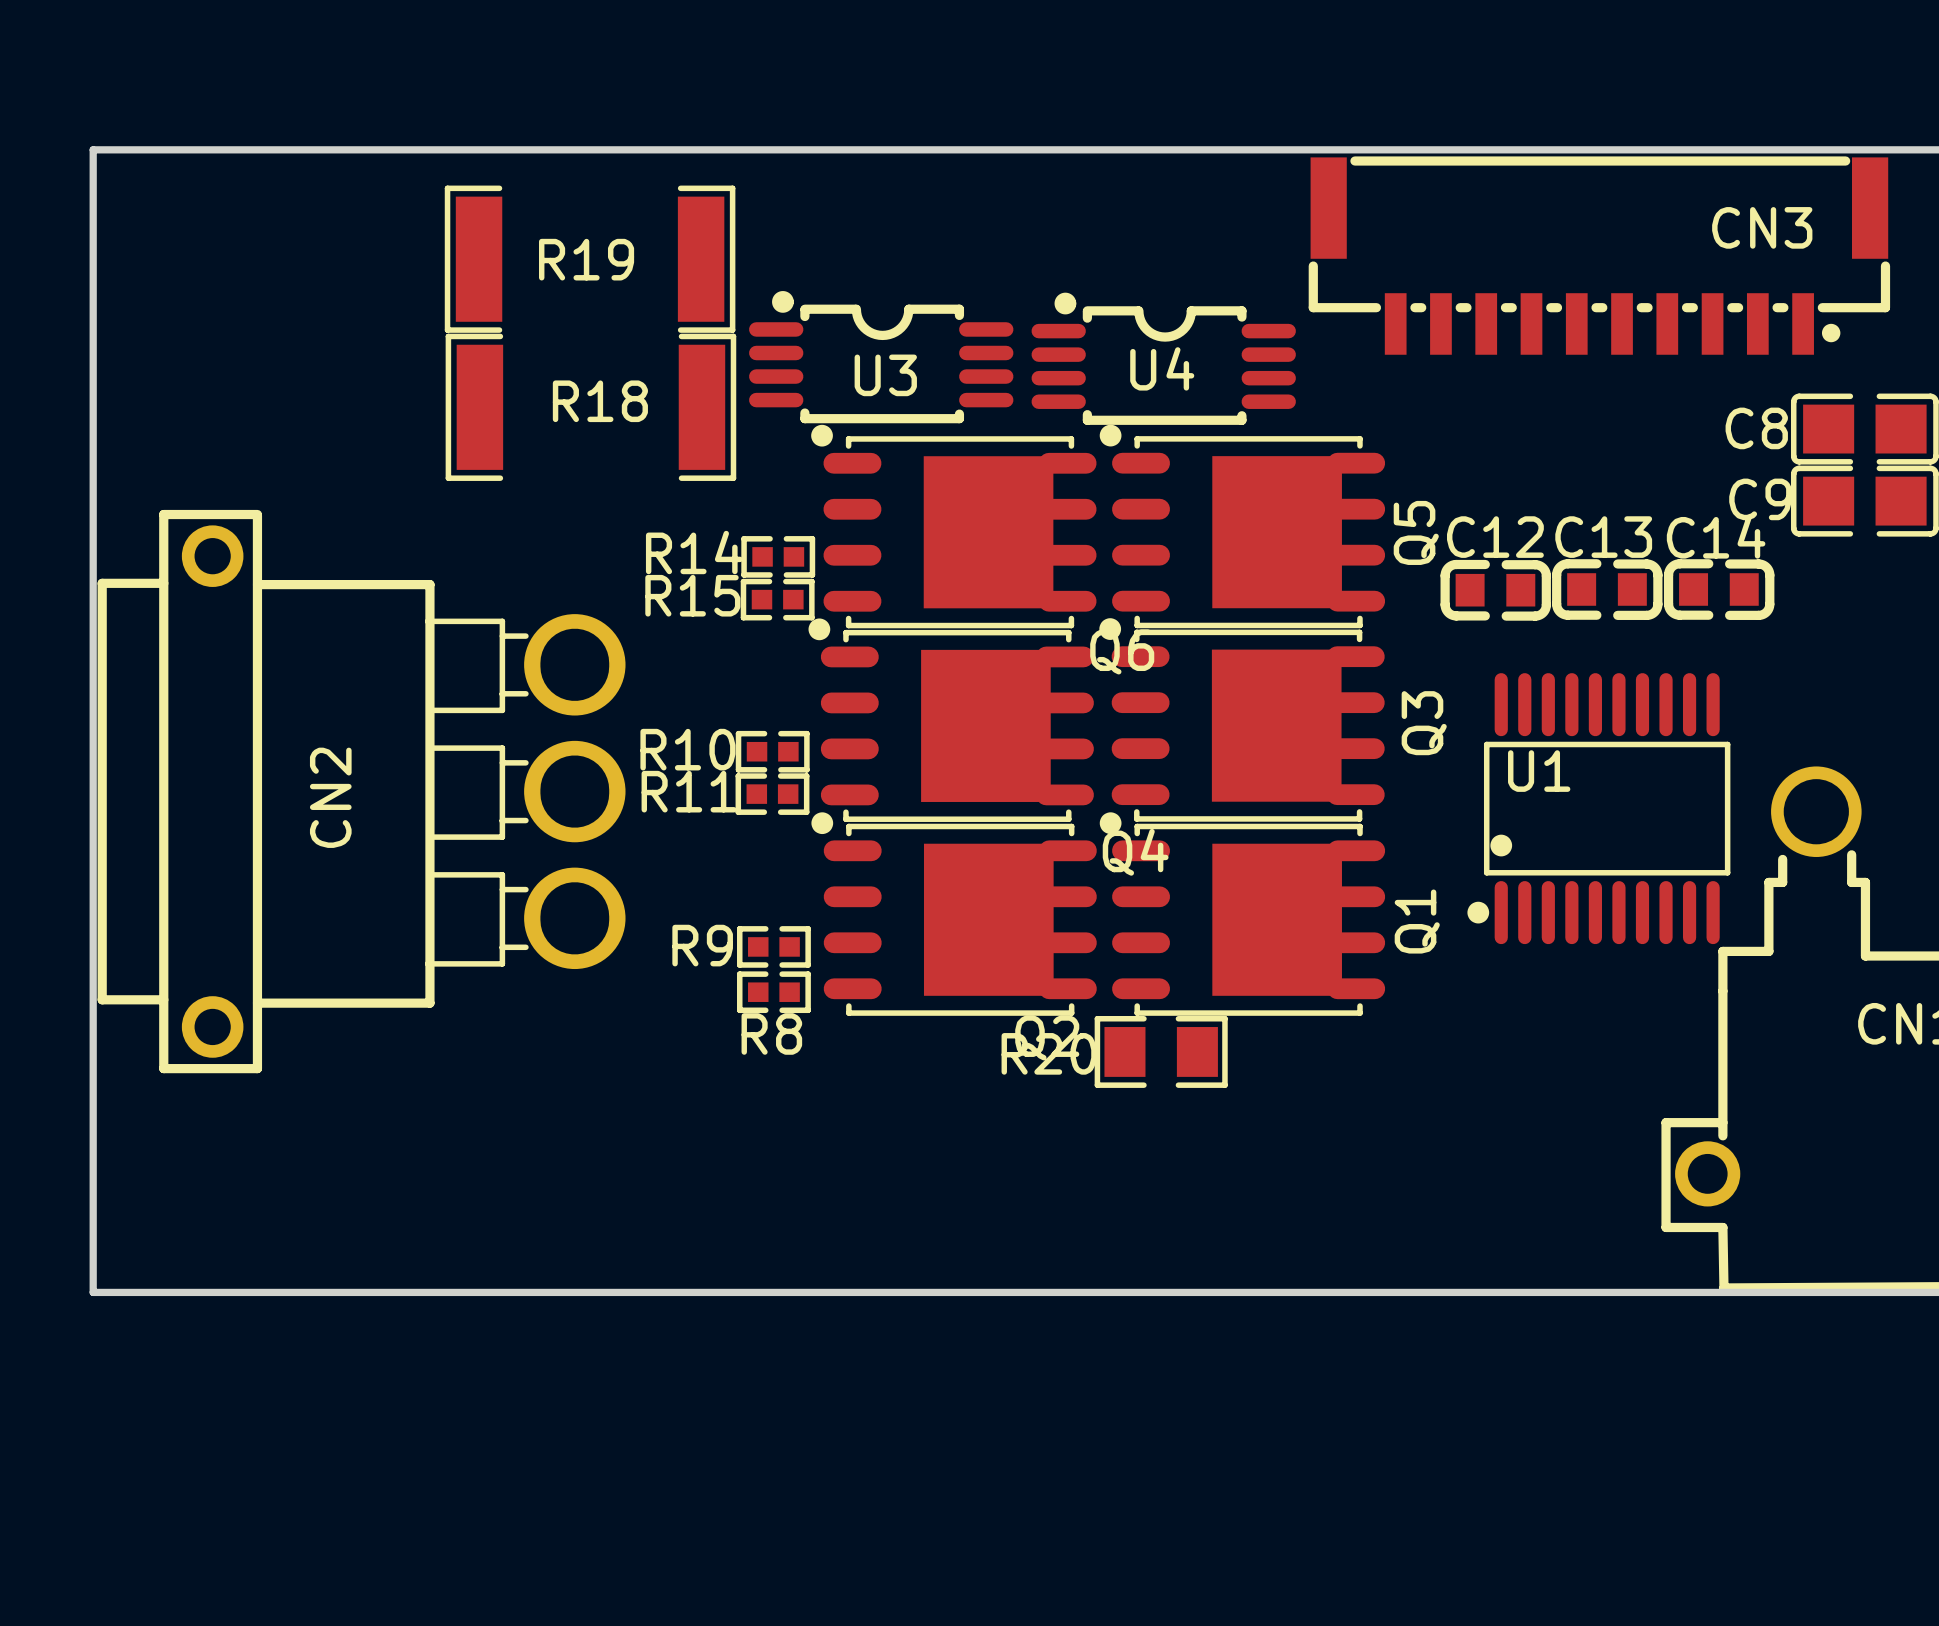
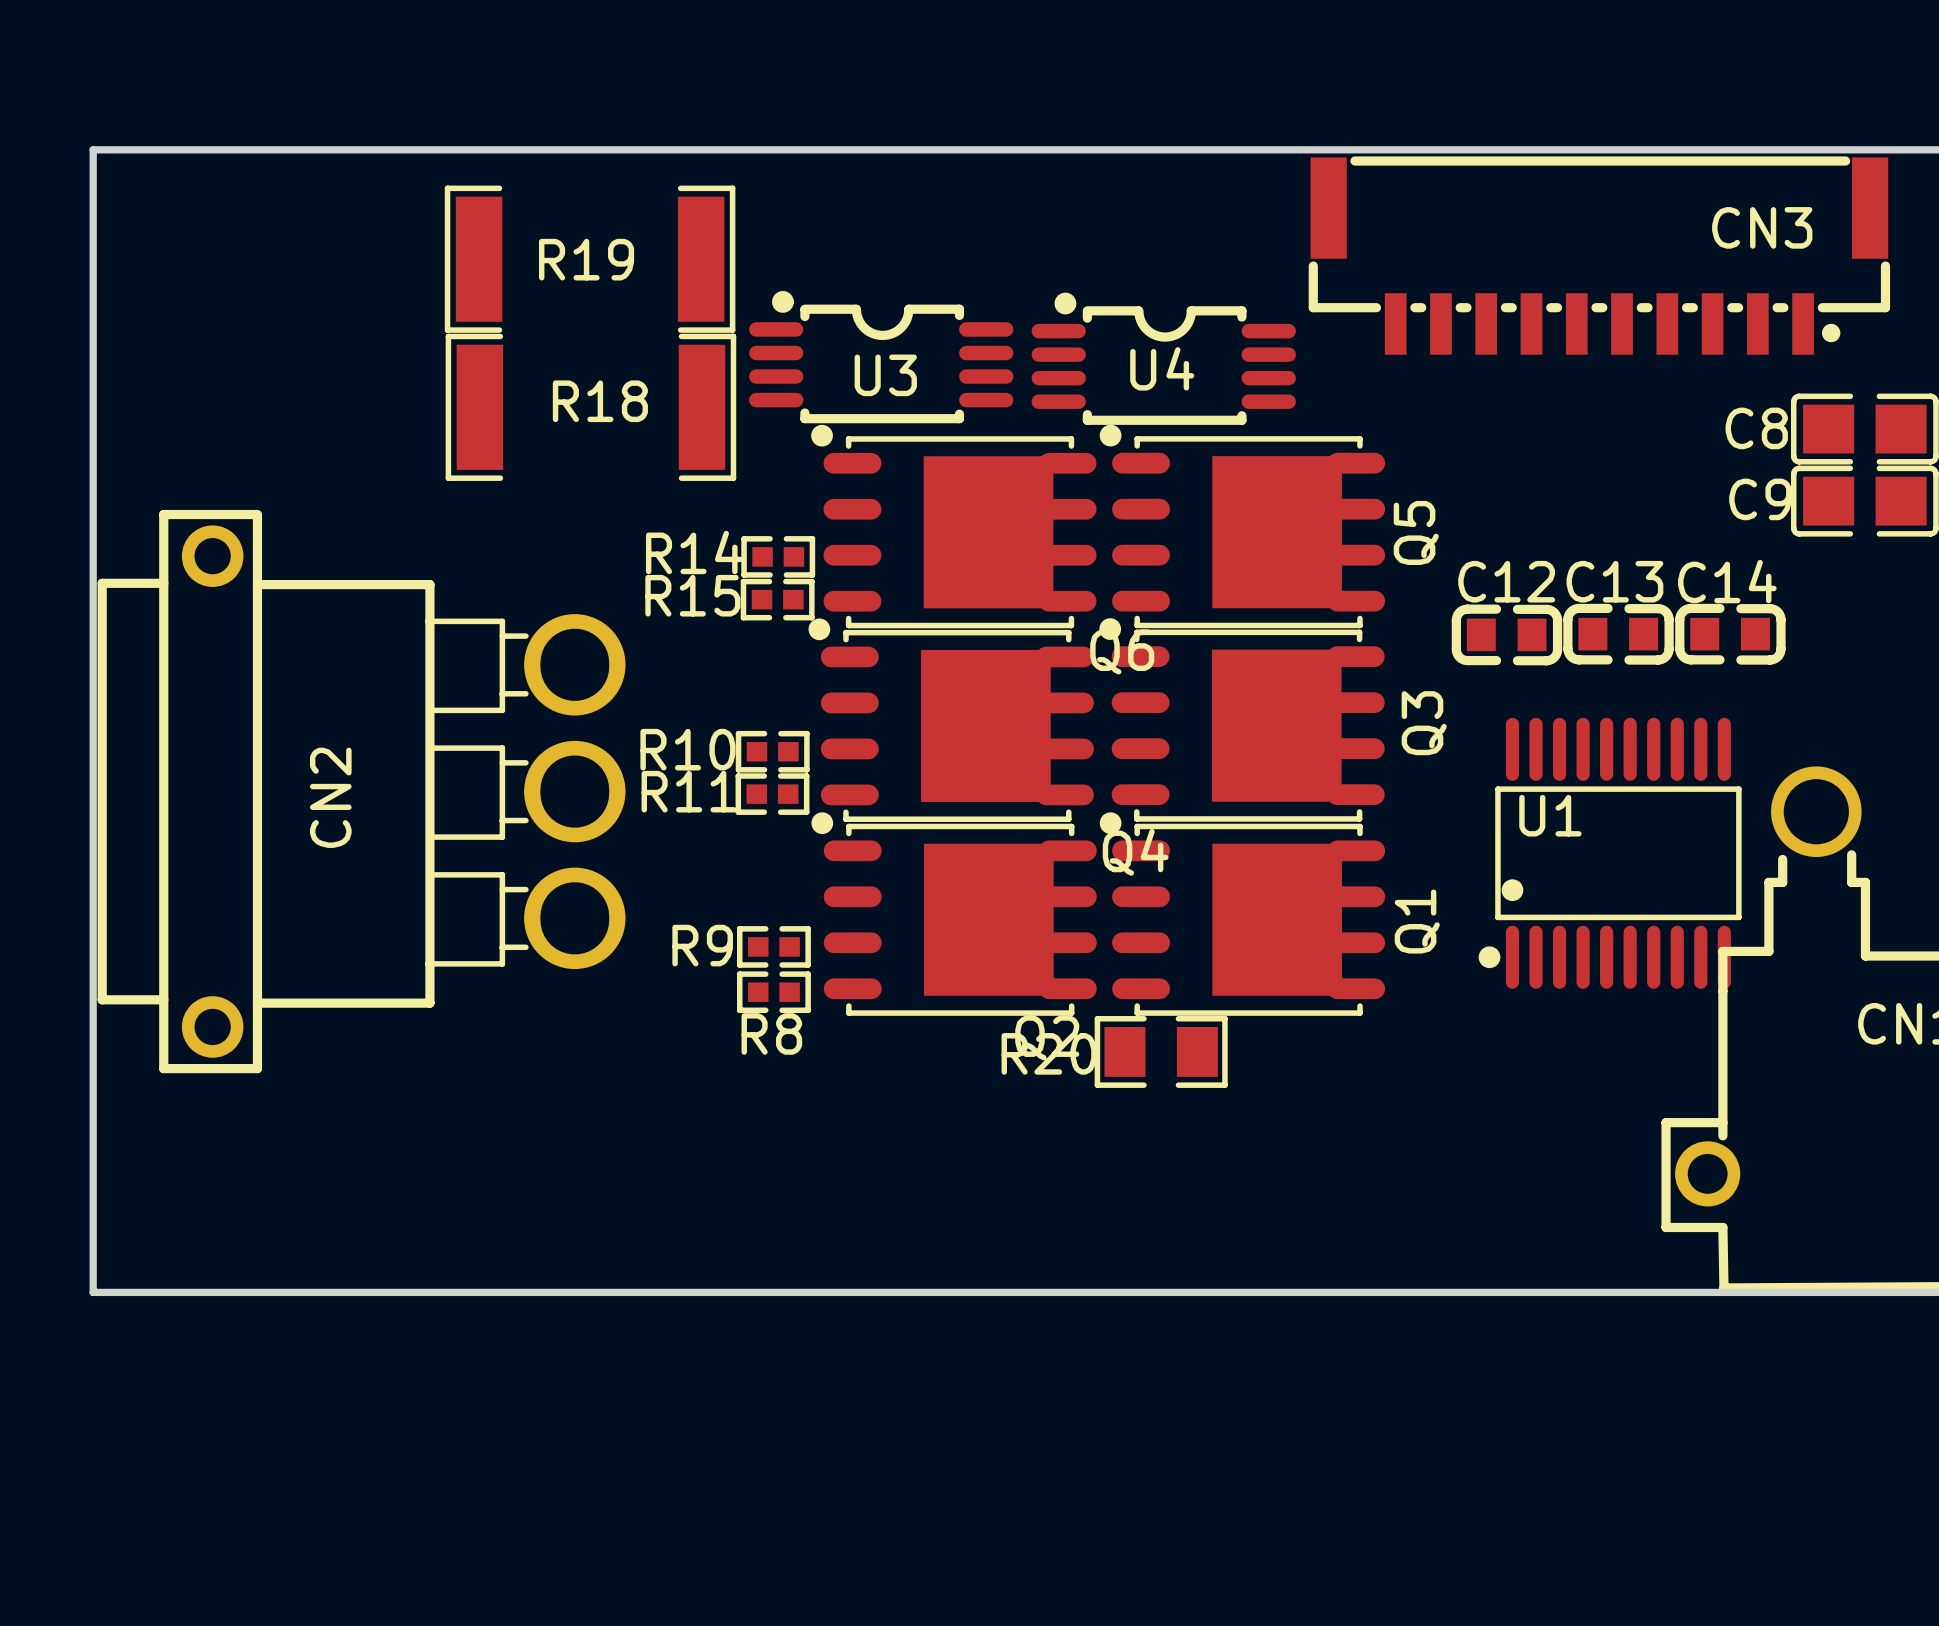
C13 position: (1607, 589) -> (1618, 634)
C14 position: (1719, 589) -> (1730, 634)
C12 position: (1495, 590) -> (1506, 634)
U1 position: (1598, 808) -> (1610, 853)

